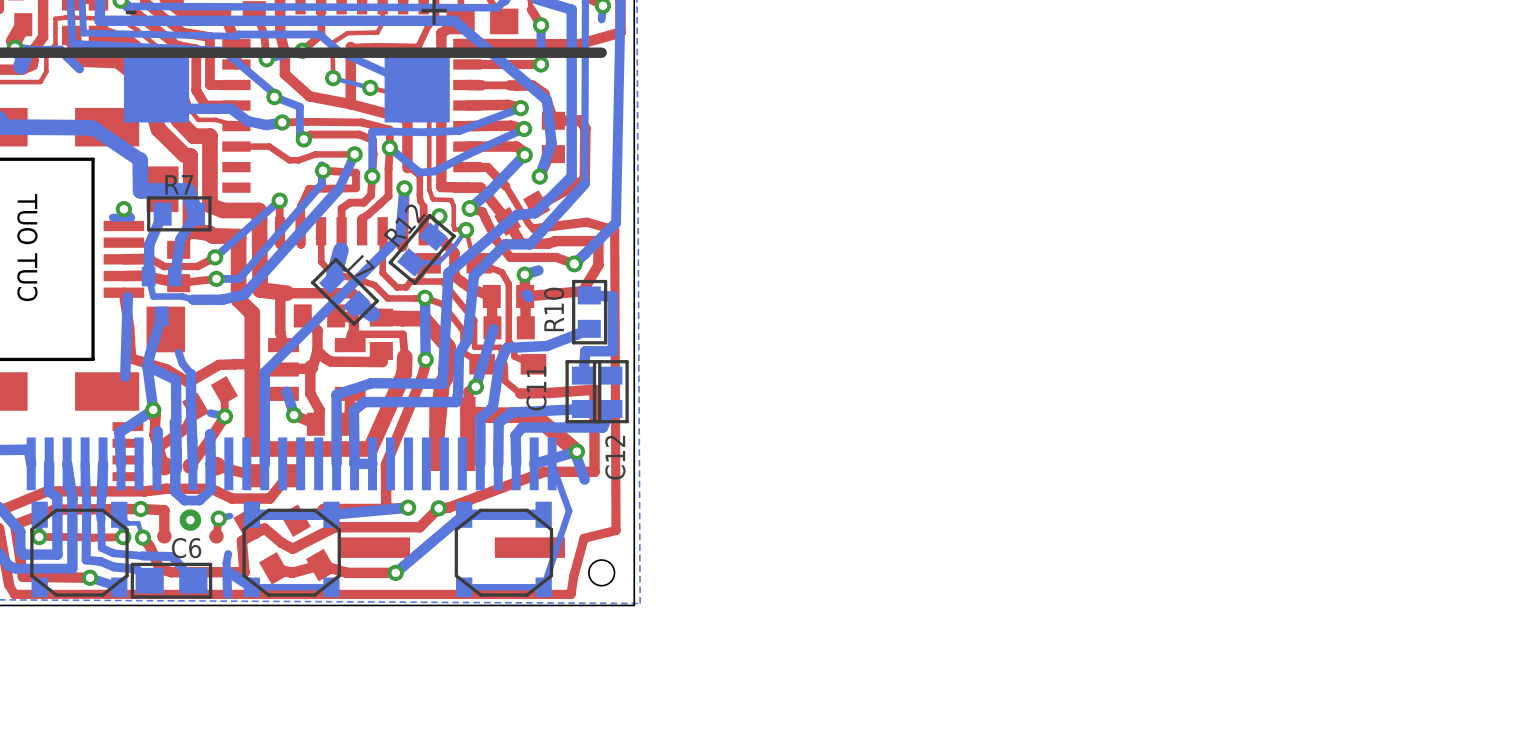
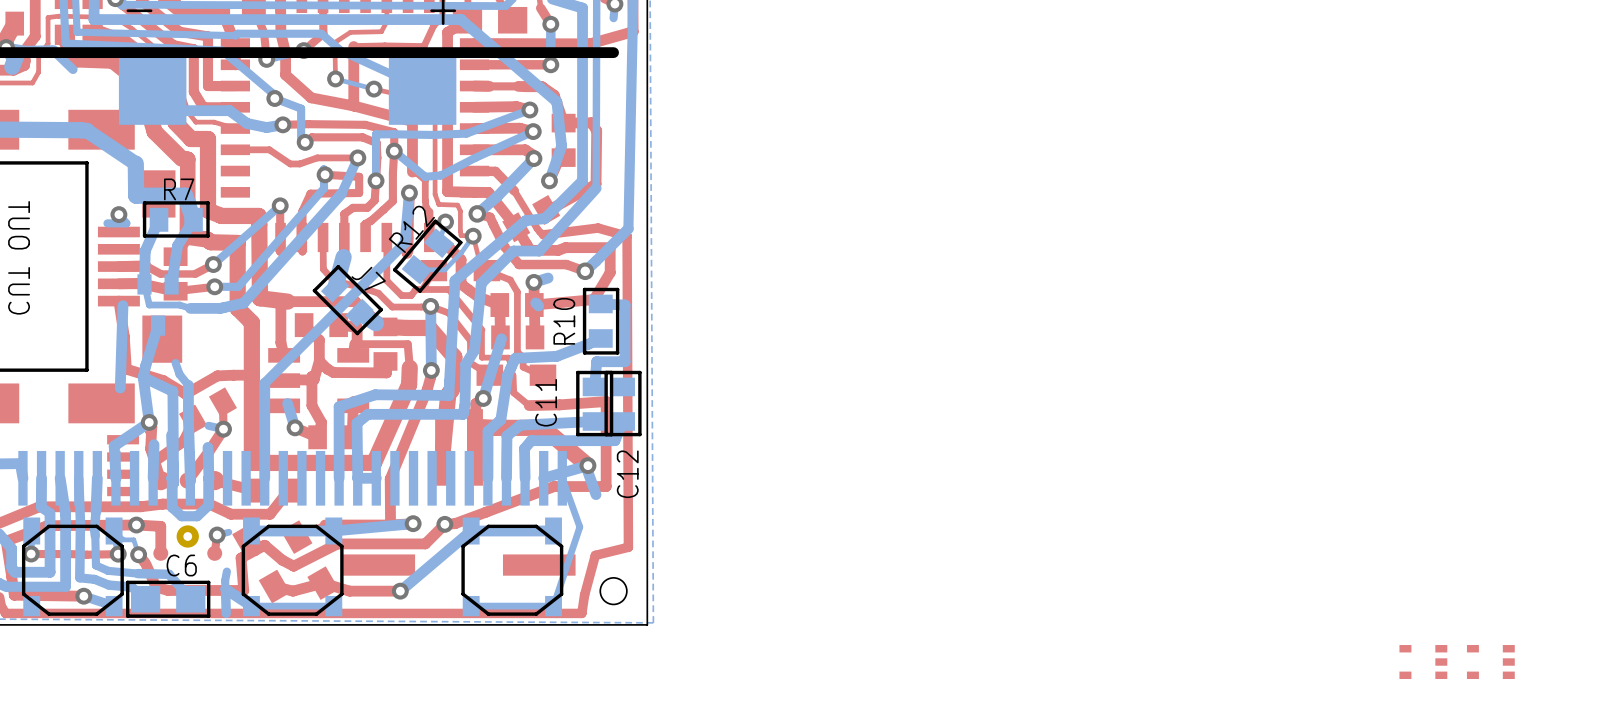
part: none -> (1423, 662)
part: none -> (1490, 662)

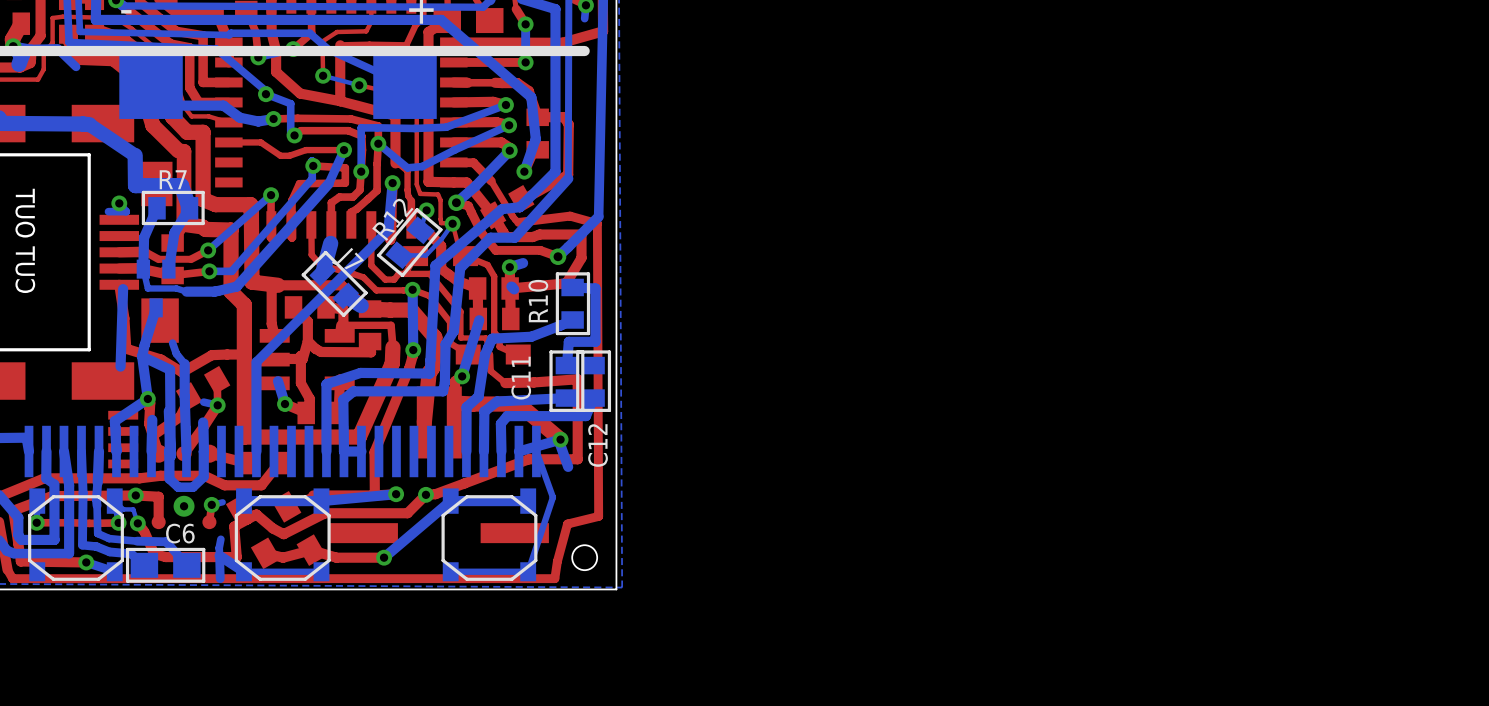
part: (1423, 662) -> none
part: (1490, 662) -> none

